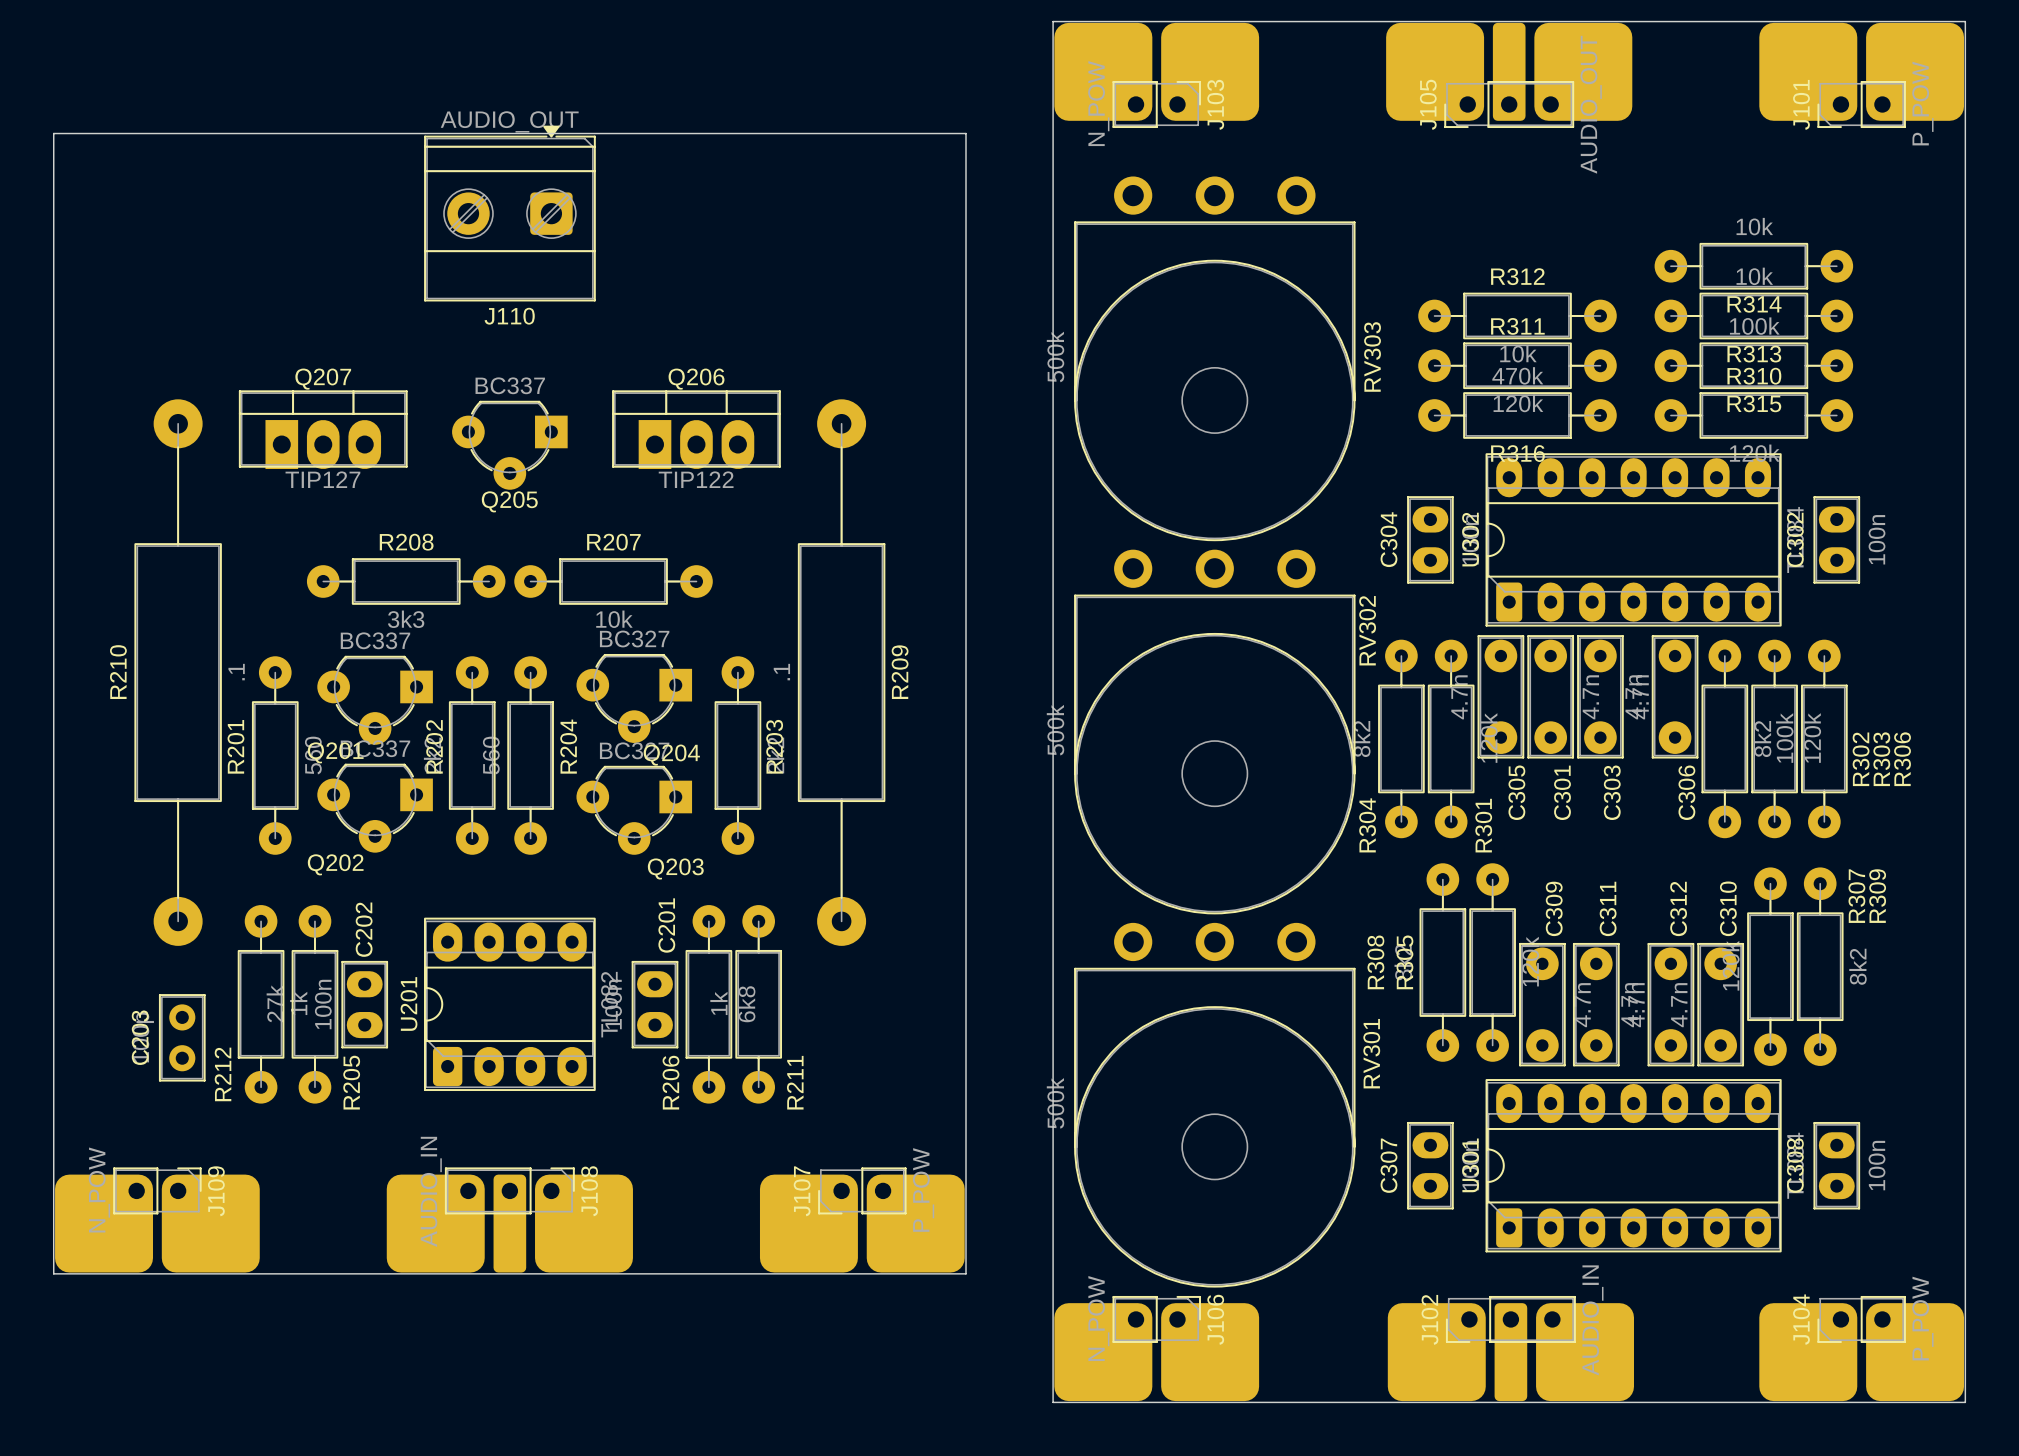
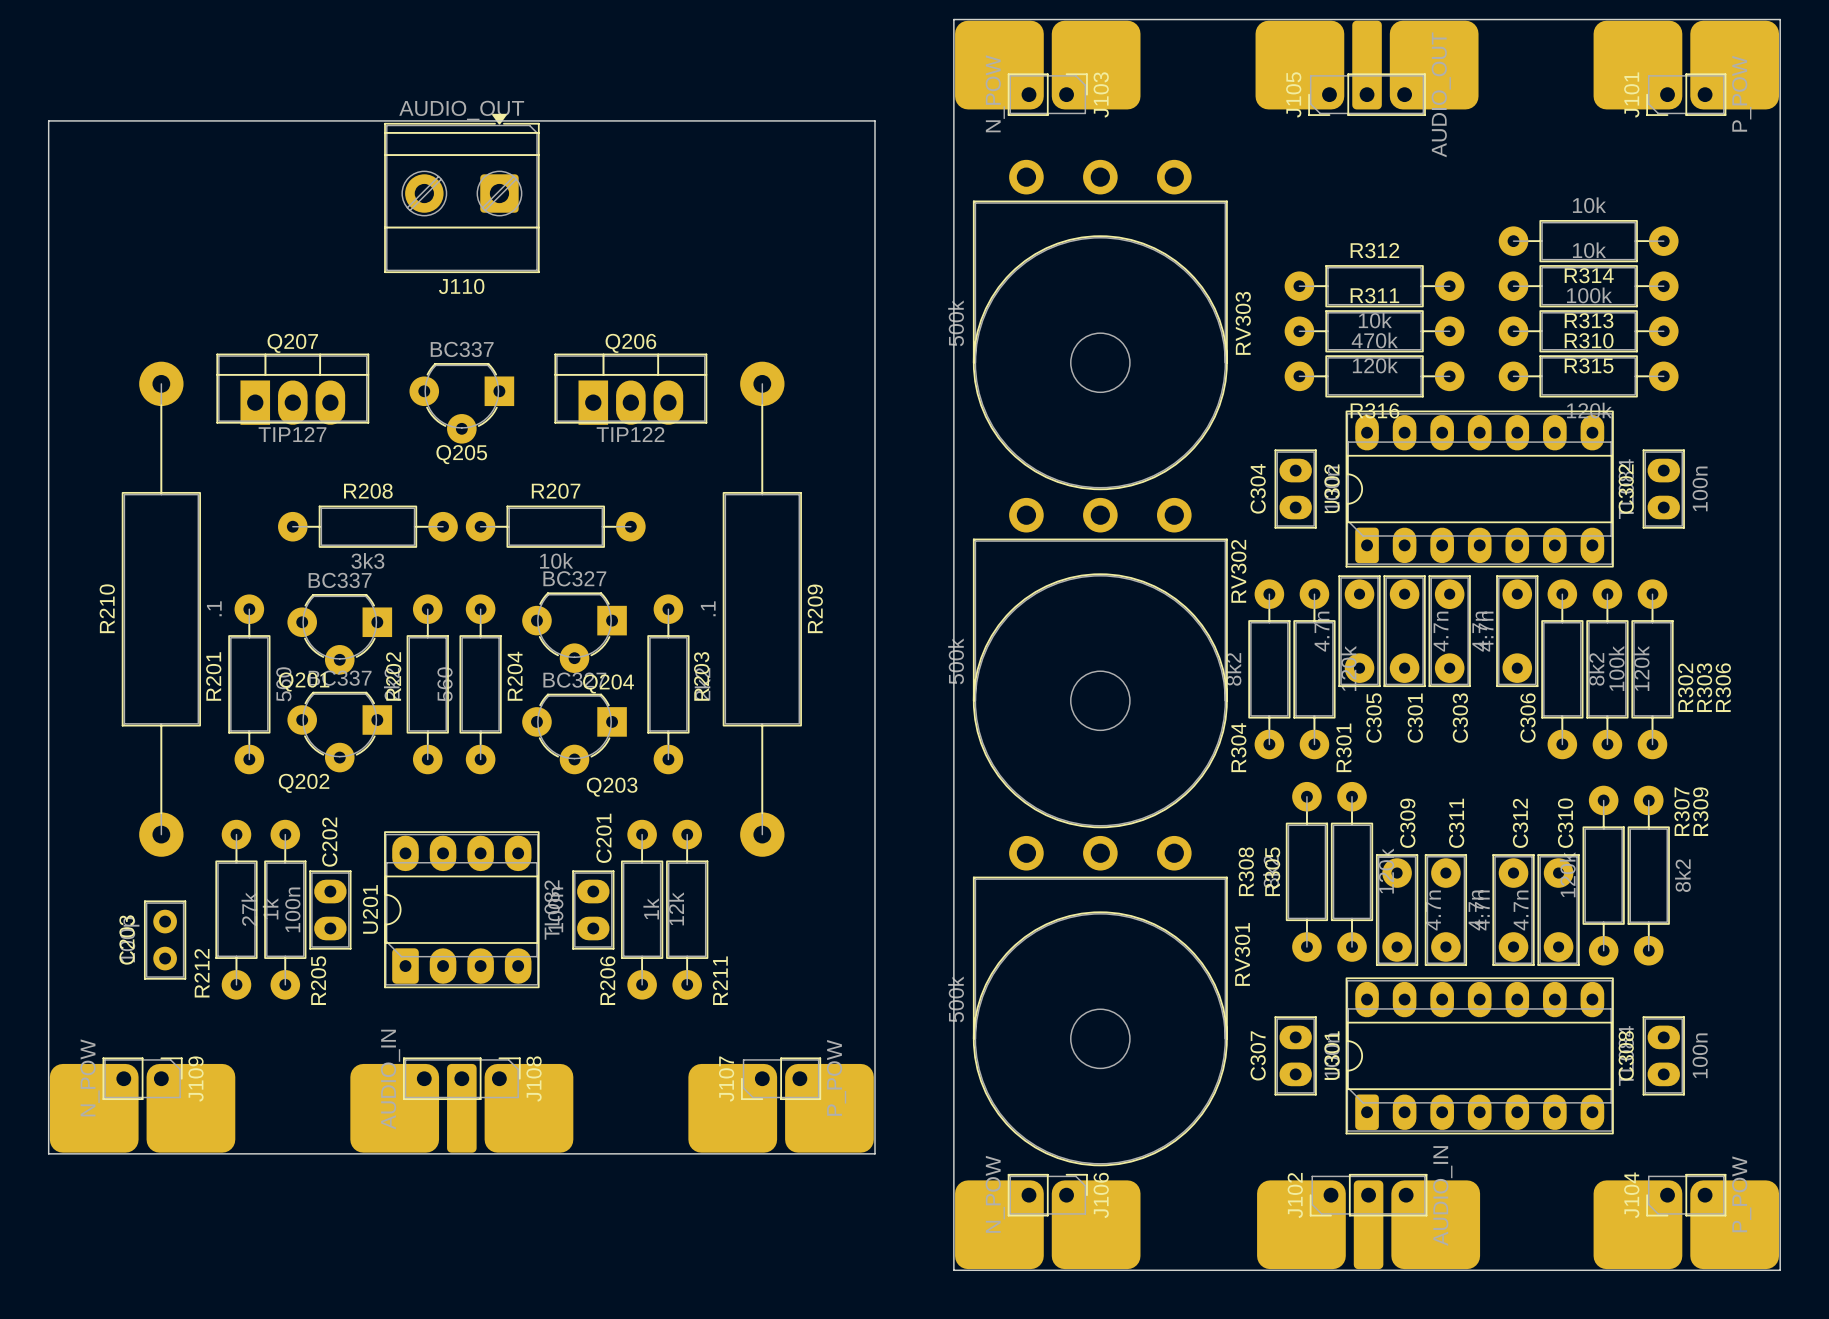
R206 value: 6k8 (746, 1004) -> 12k (676, 908)

